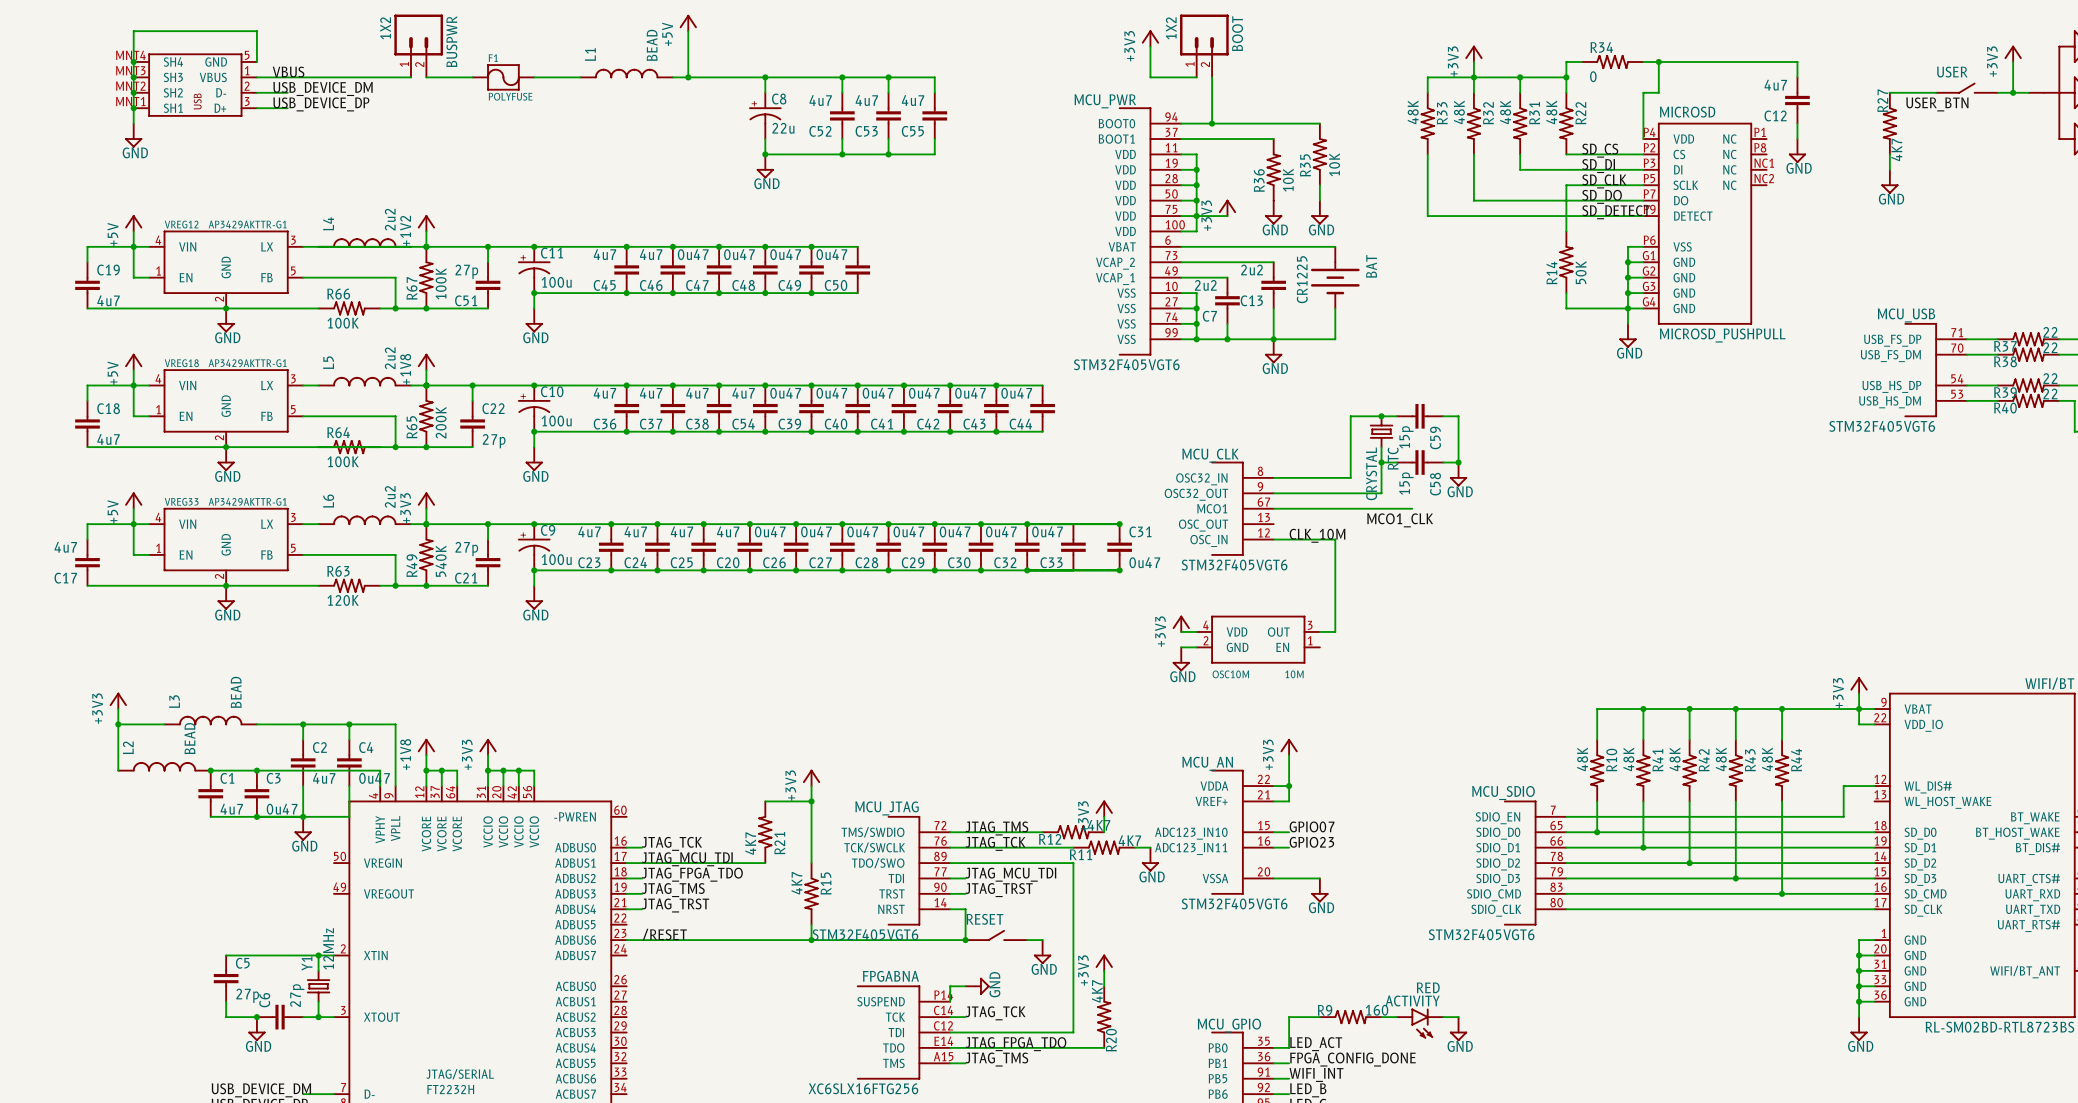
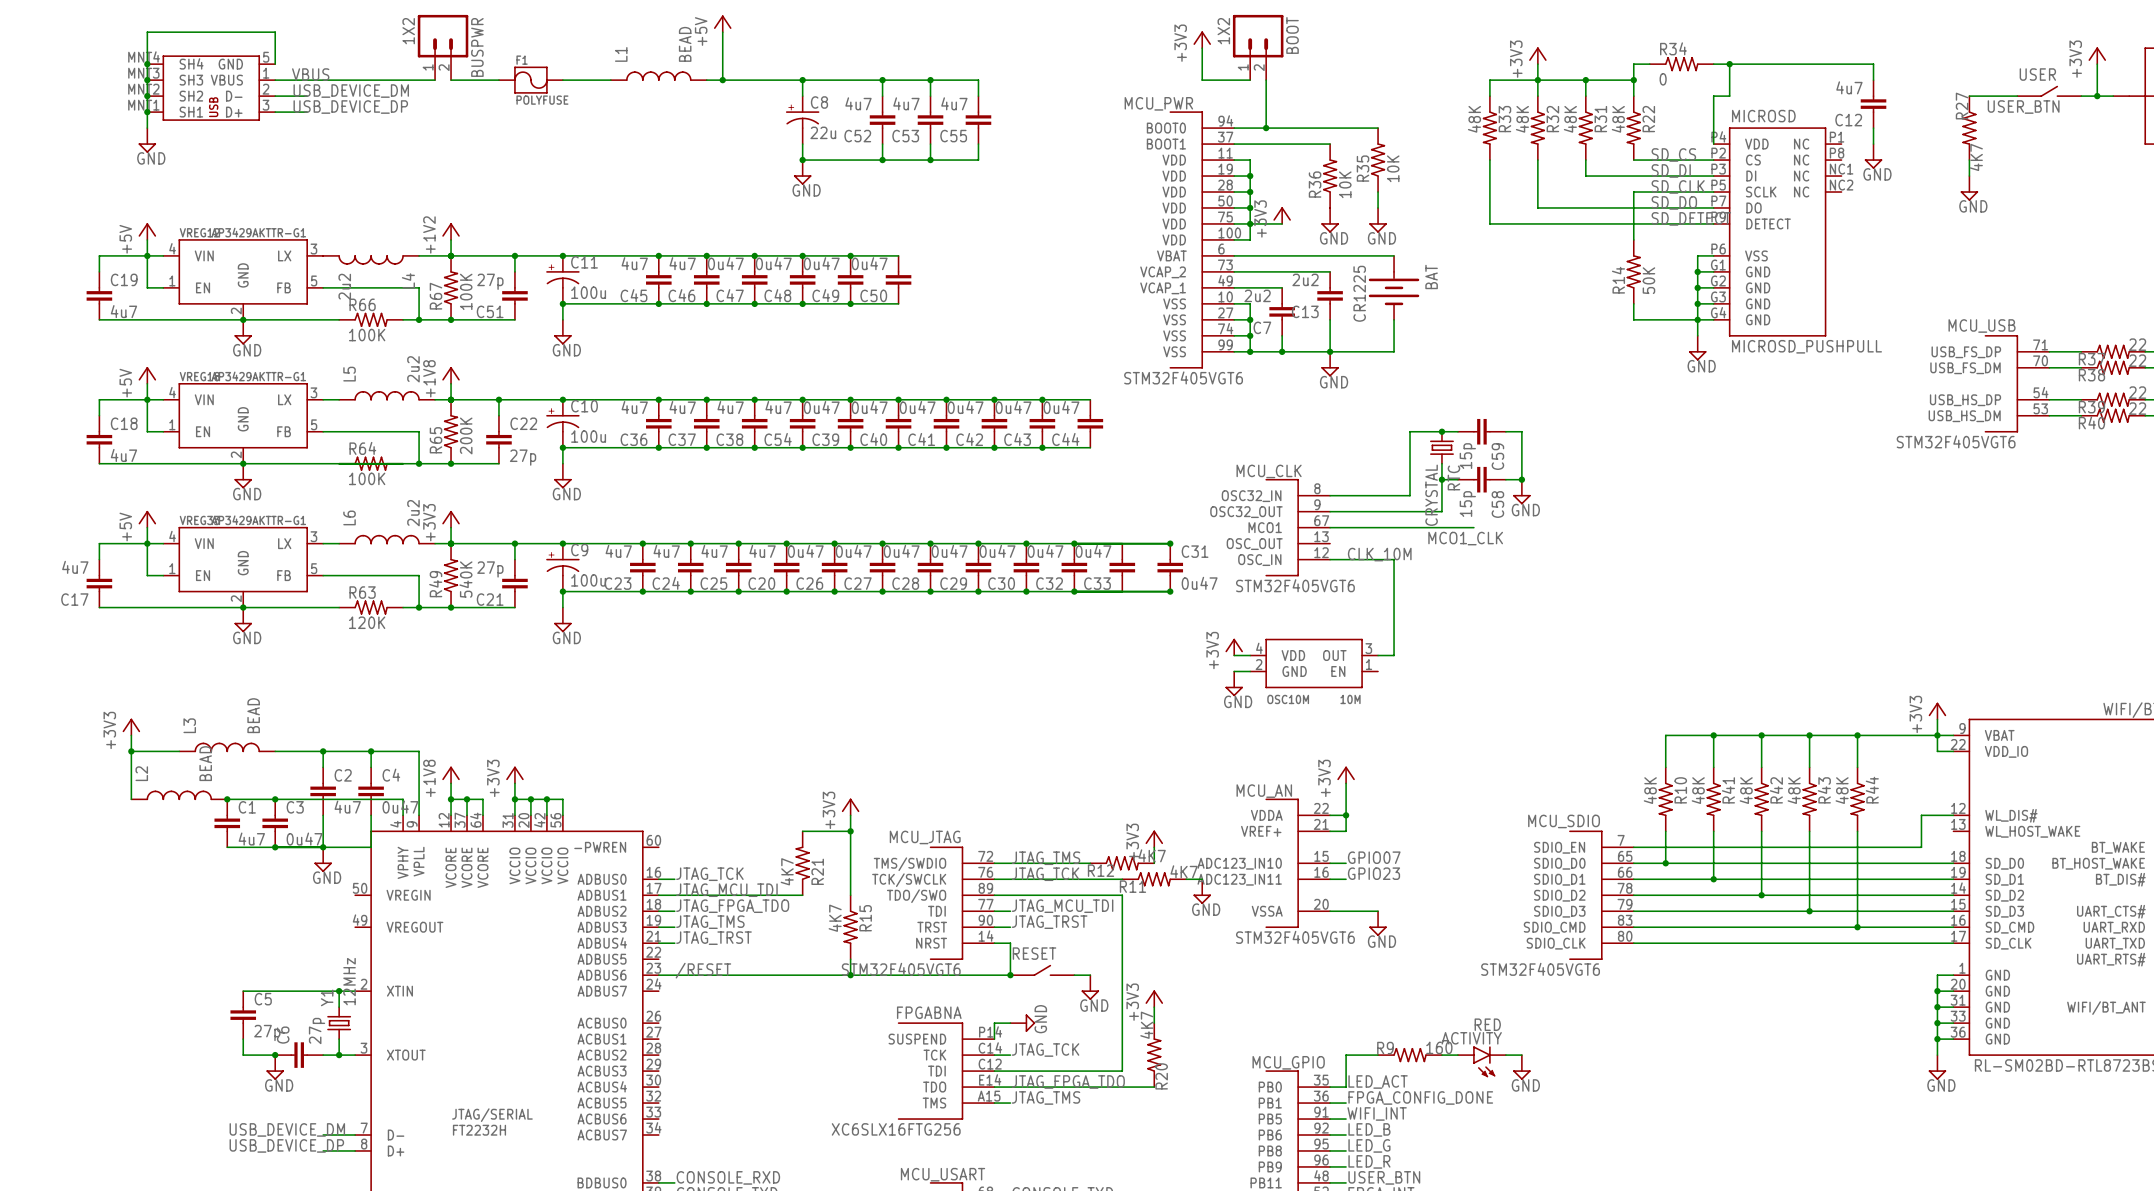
L4 rotation: 0° (364, 243) -> 180° (371, 259)
wire: (303, 246) (395, 246) -> none

